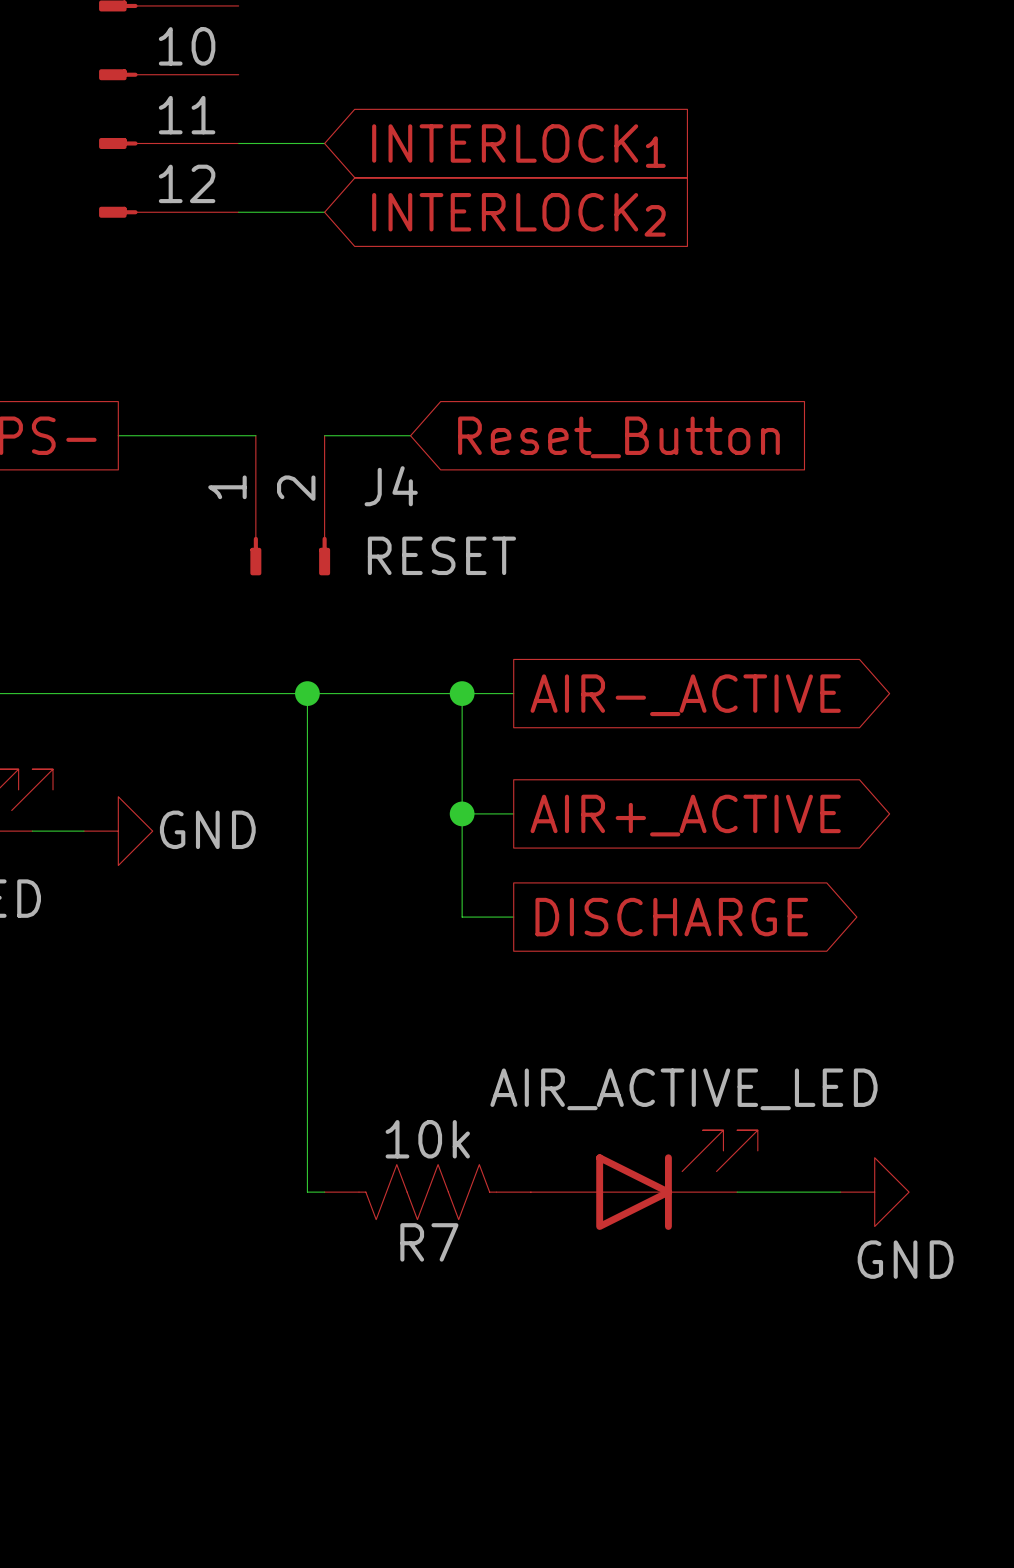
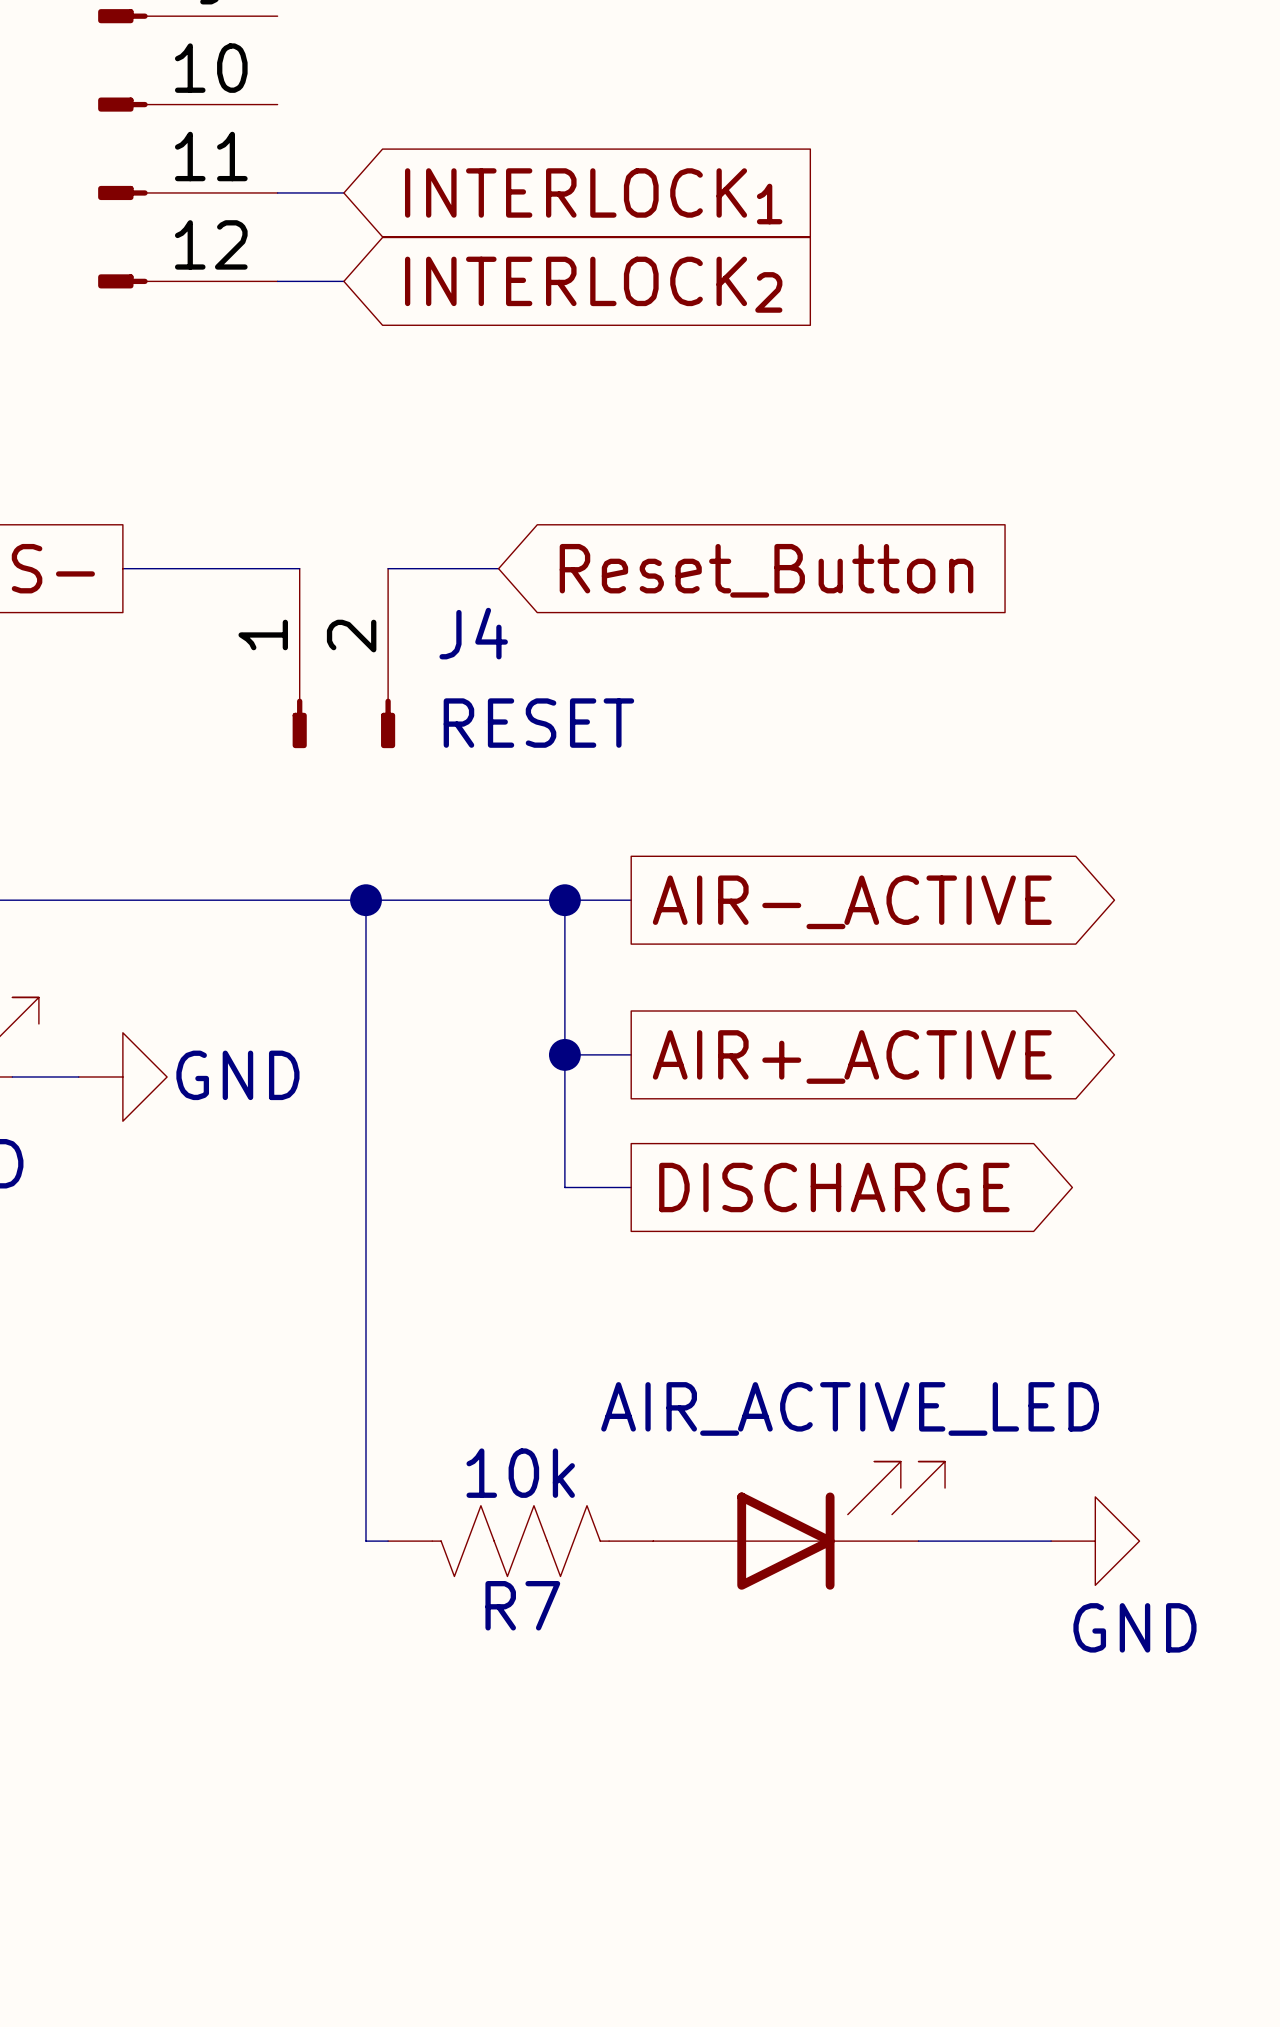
wire: (290, 143) (324, 143) -> none
global label position: INTERLOCK1 (518, 146) -> INTERLOCK1 (593, 196)
wire: (290, 212) (324, 212) -> none
global label position: INTERLOCK2 (518, 214) -> INTERLOCK2 (593, 284)

